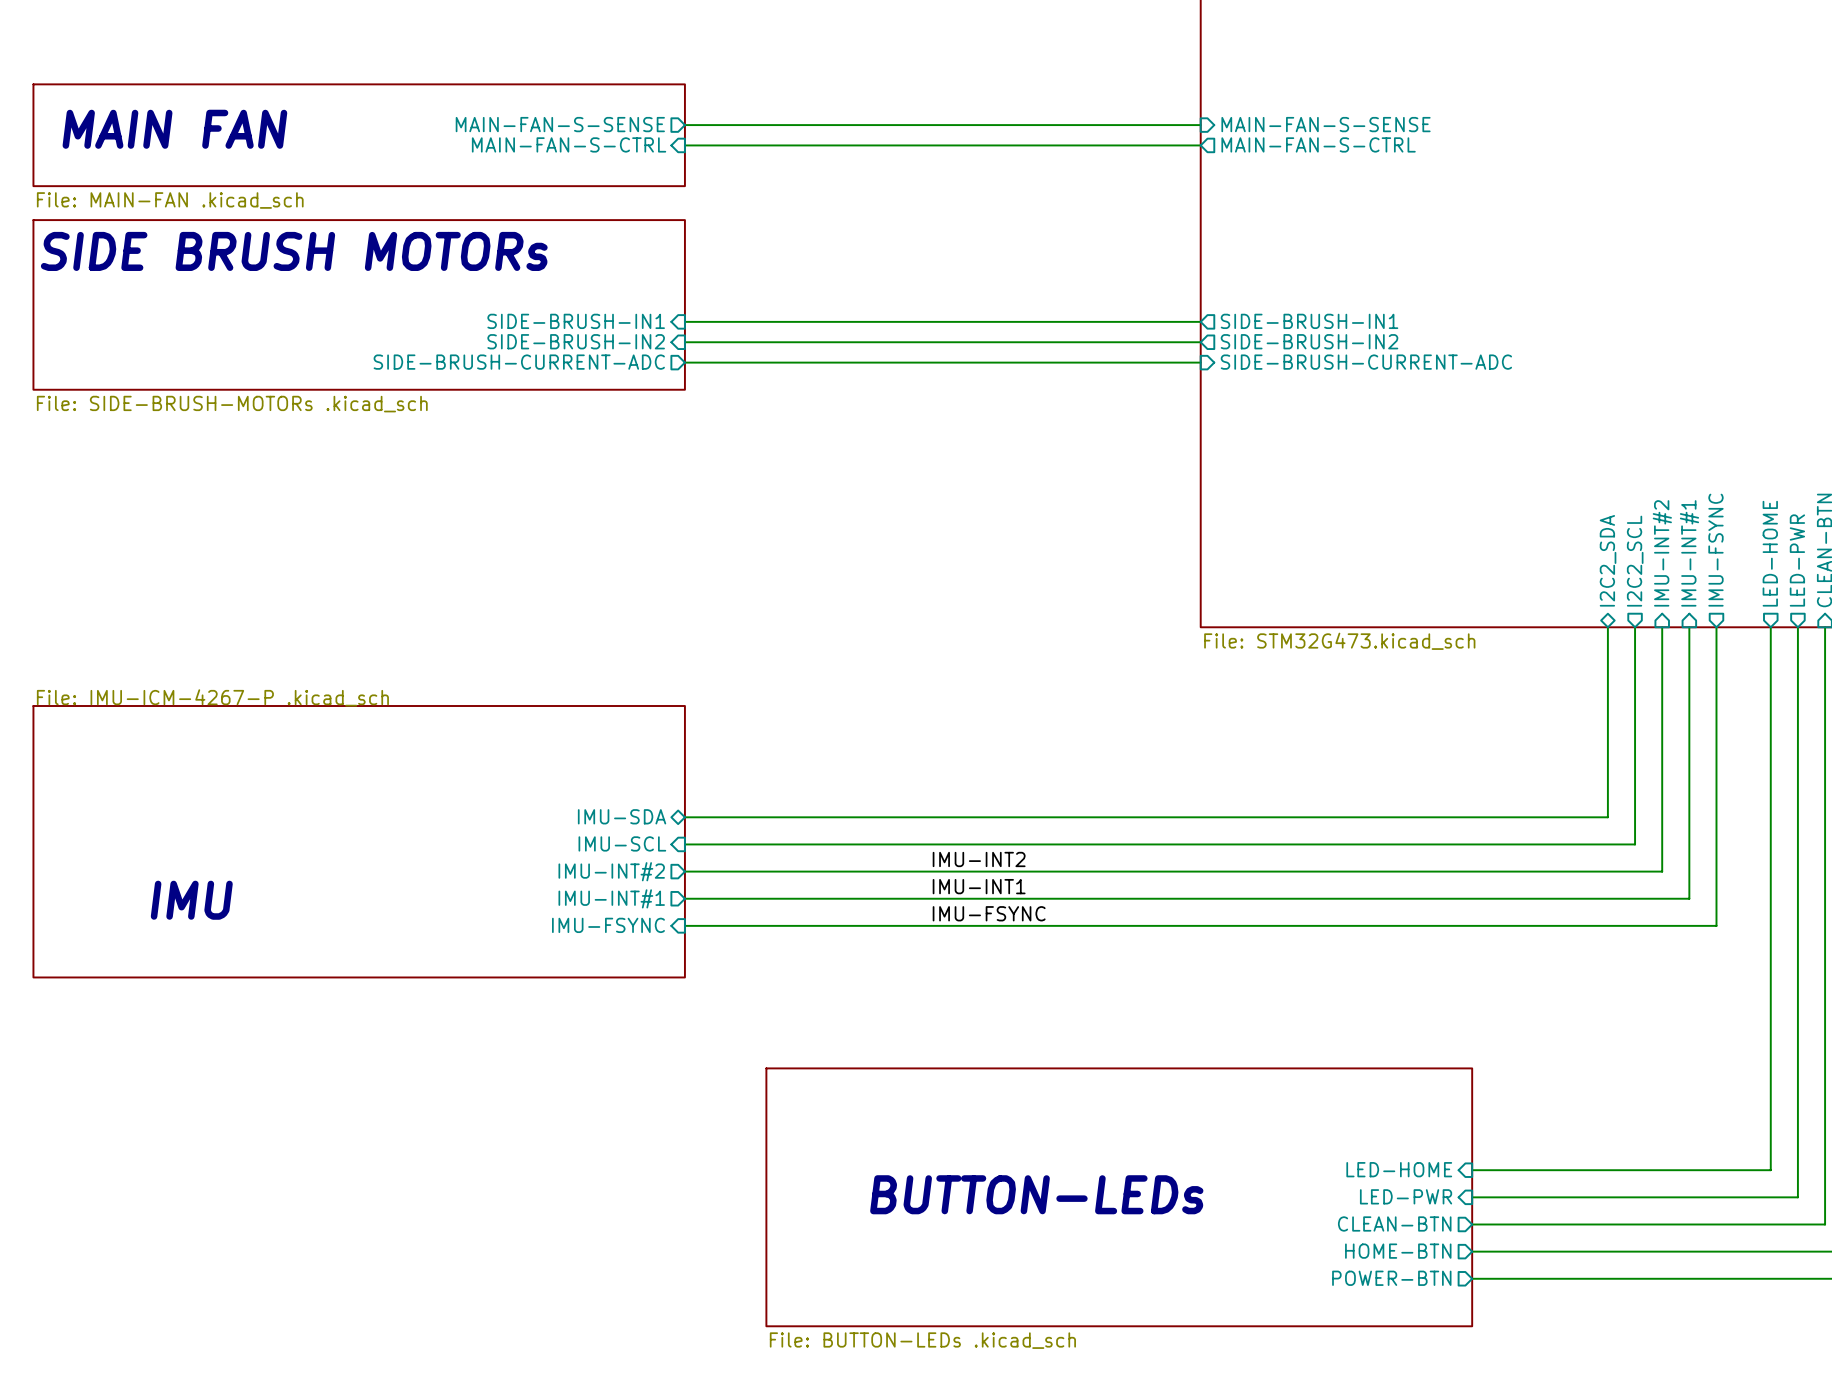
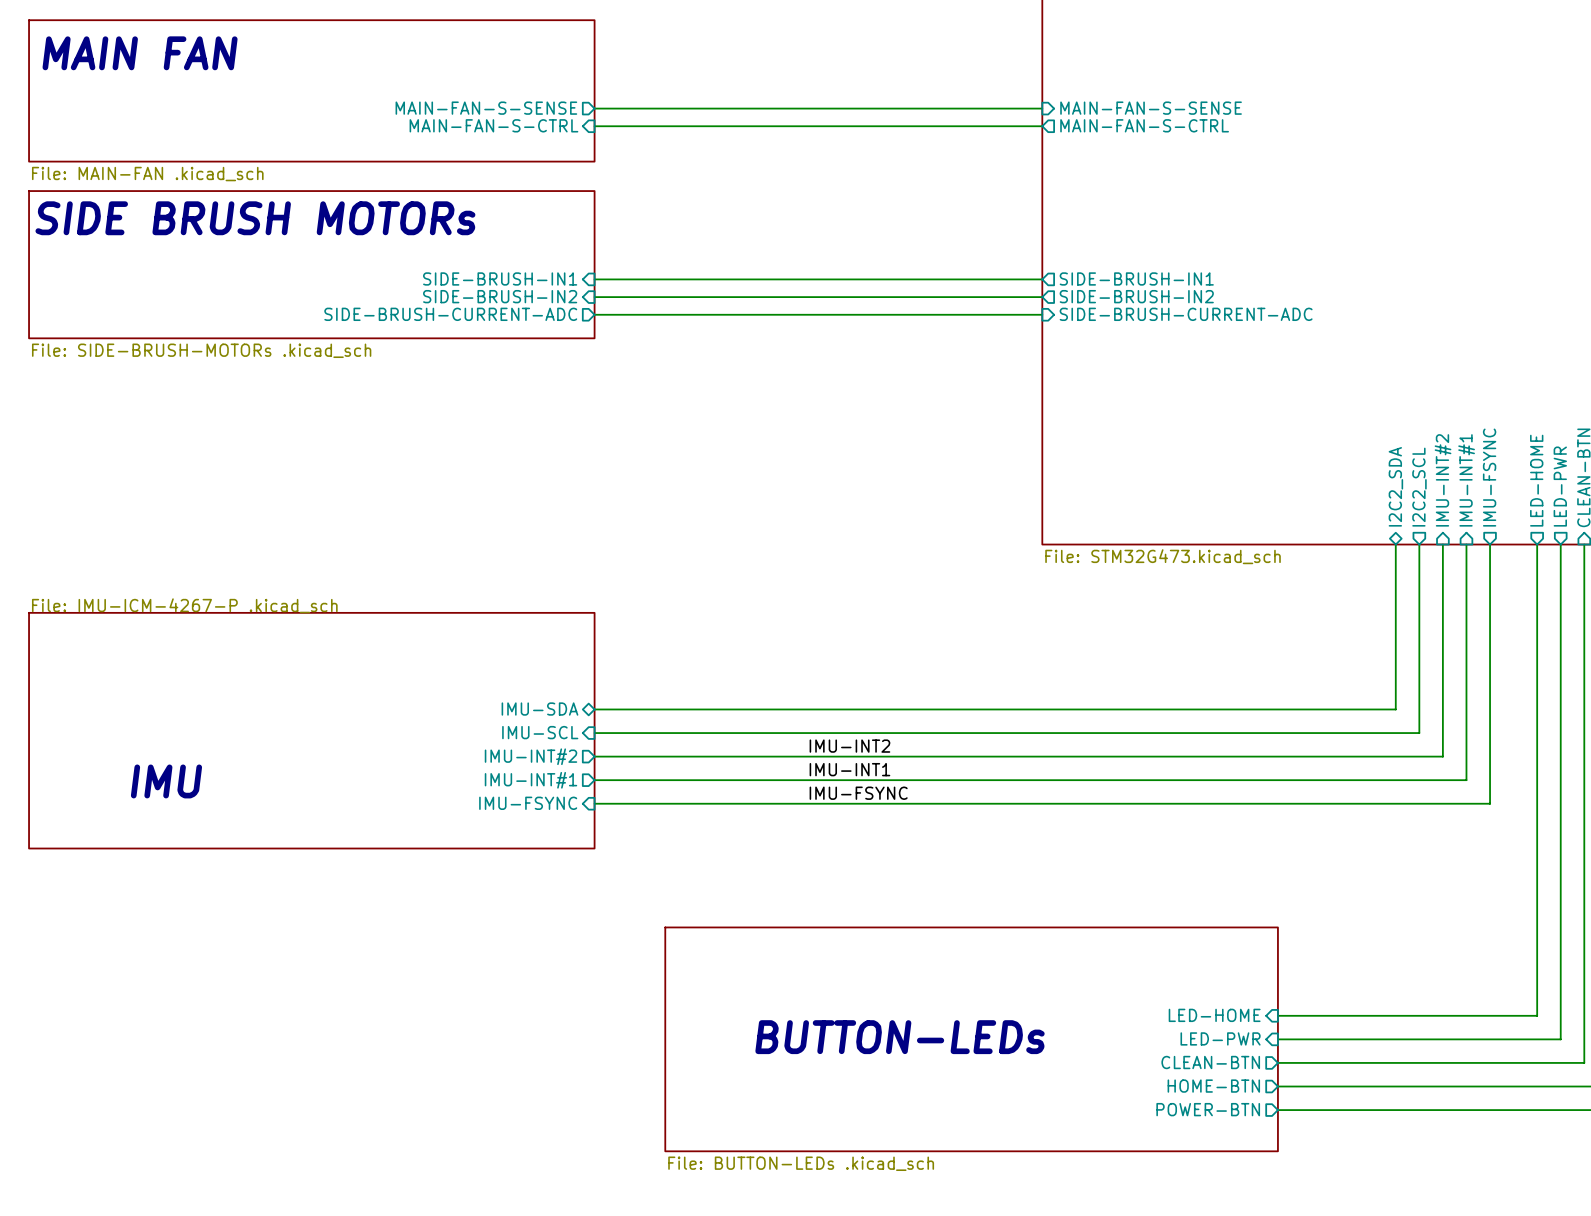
sheet: none -> File: MAIN-FAN .kicad_sch (311, 90)
text position: MAIN FAN (174, 129) -> MAIN FAN (140, 53)
sheet: File: MAIN-FAN .kicad_sch (359, 135) -> none

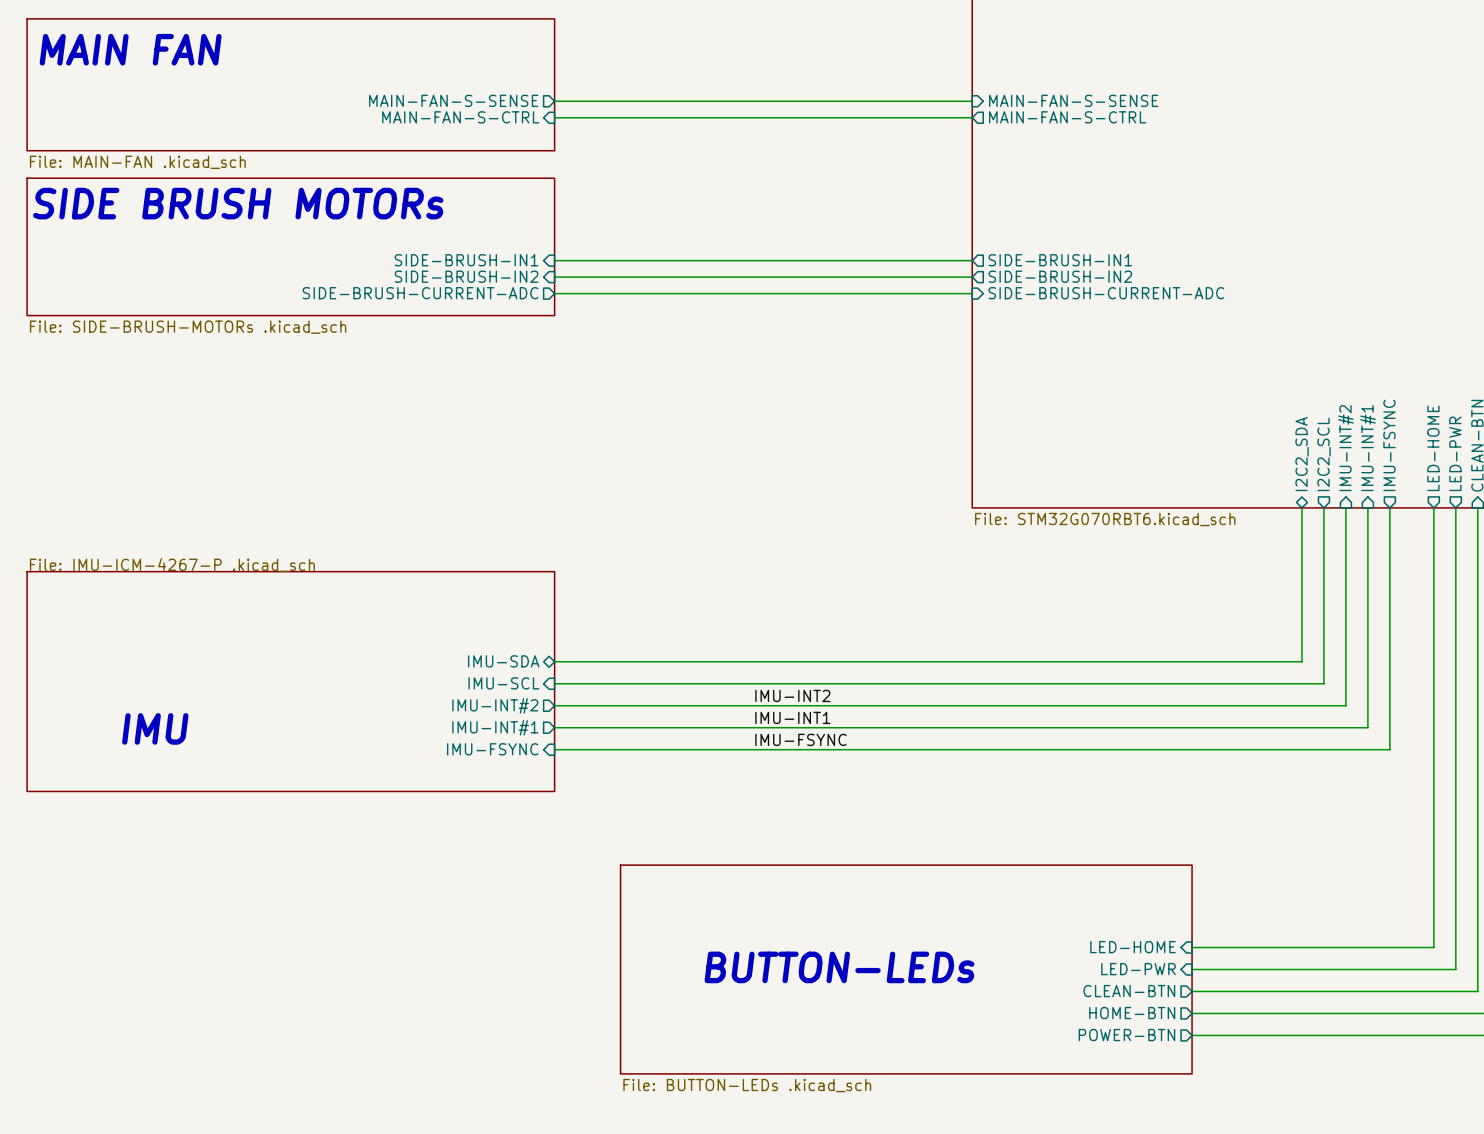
sheet value: File: STM32G473.kicad_sch (1163, 556) -> File: STM32G070RBT6.kicad_sch (1105, 519)

